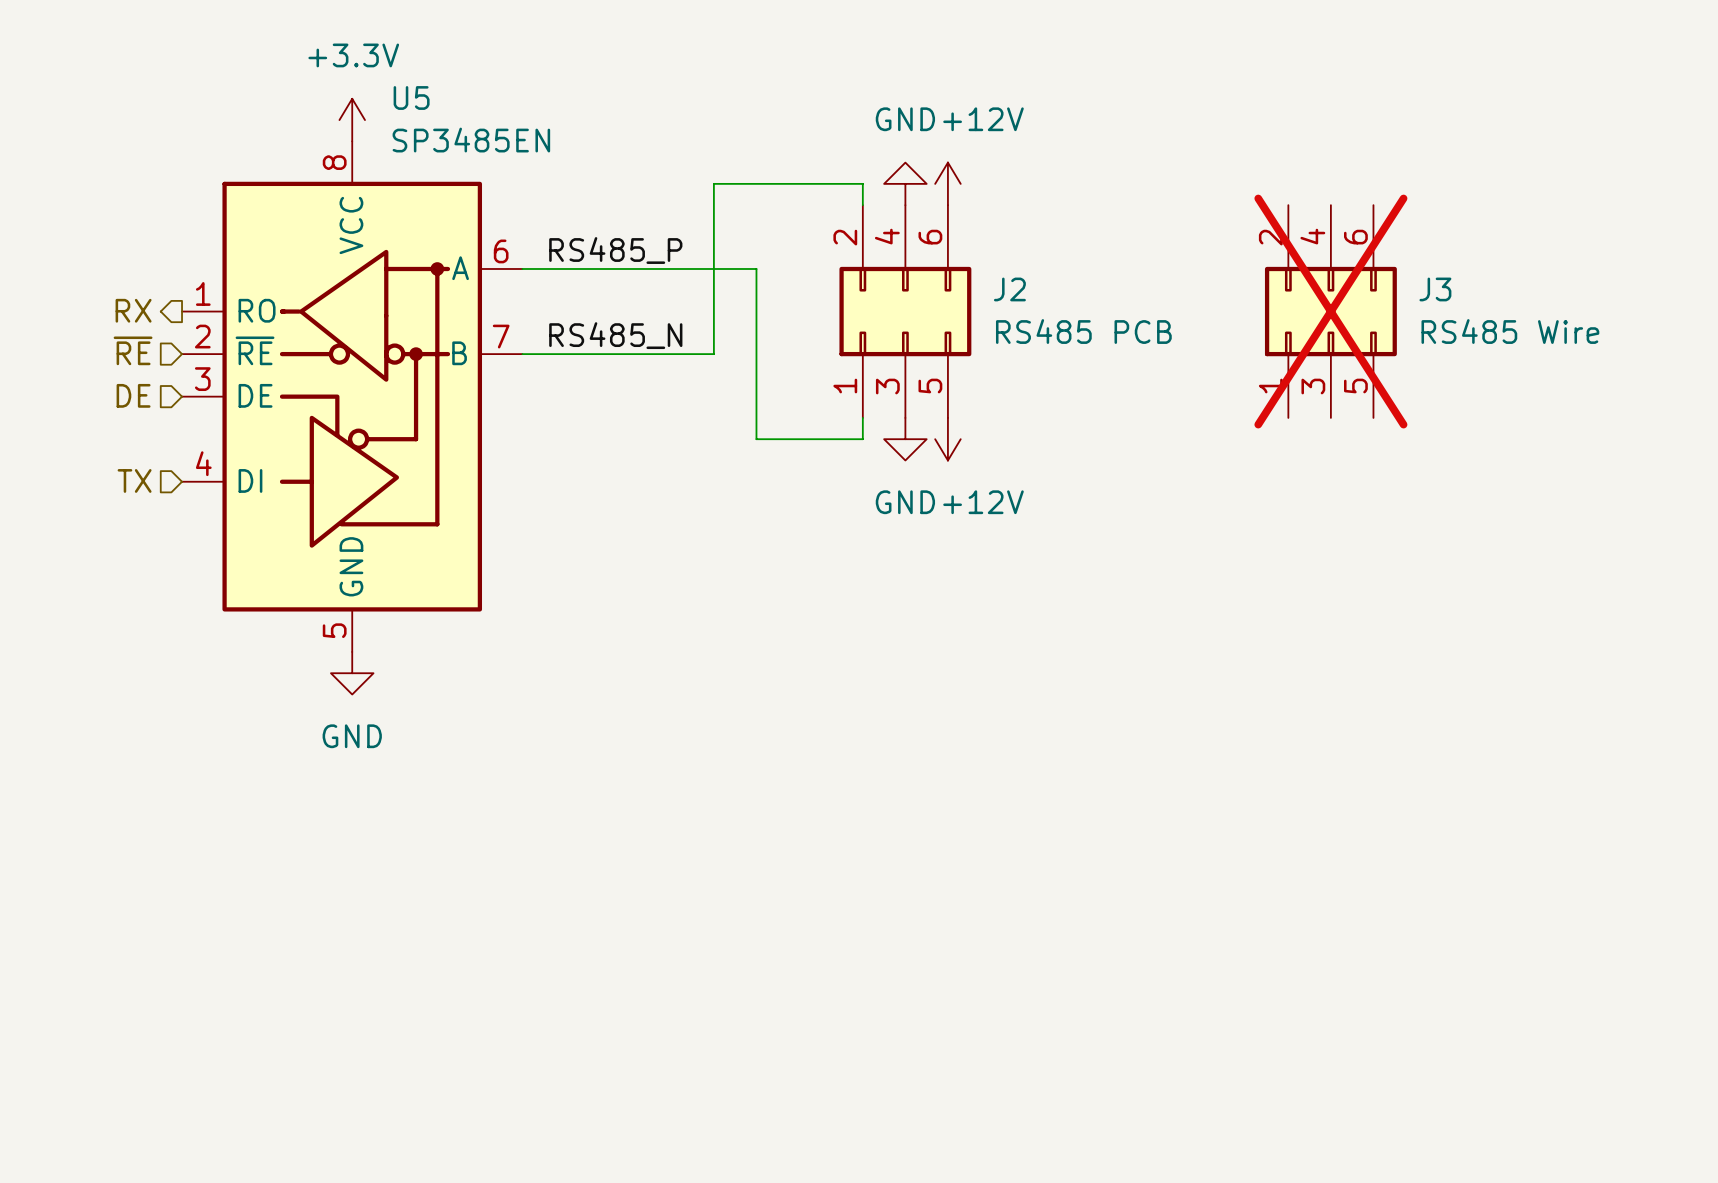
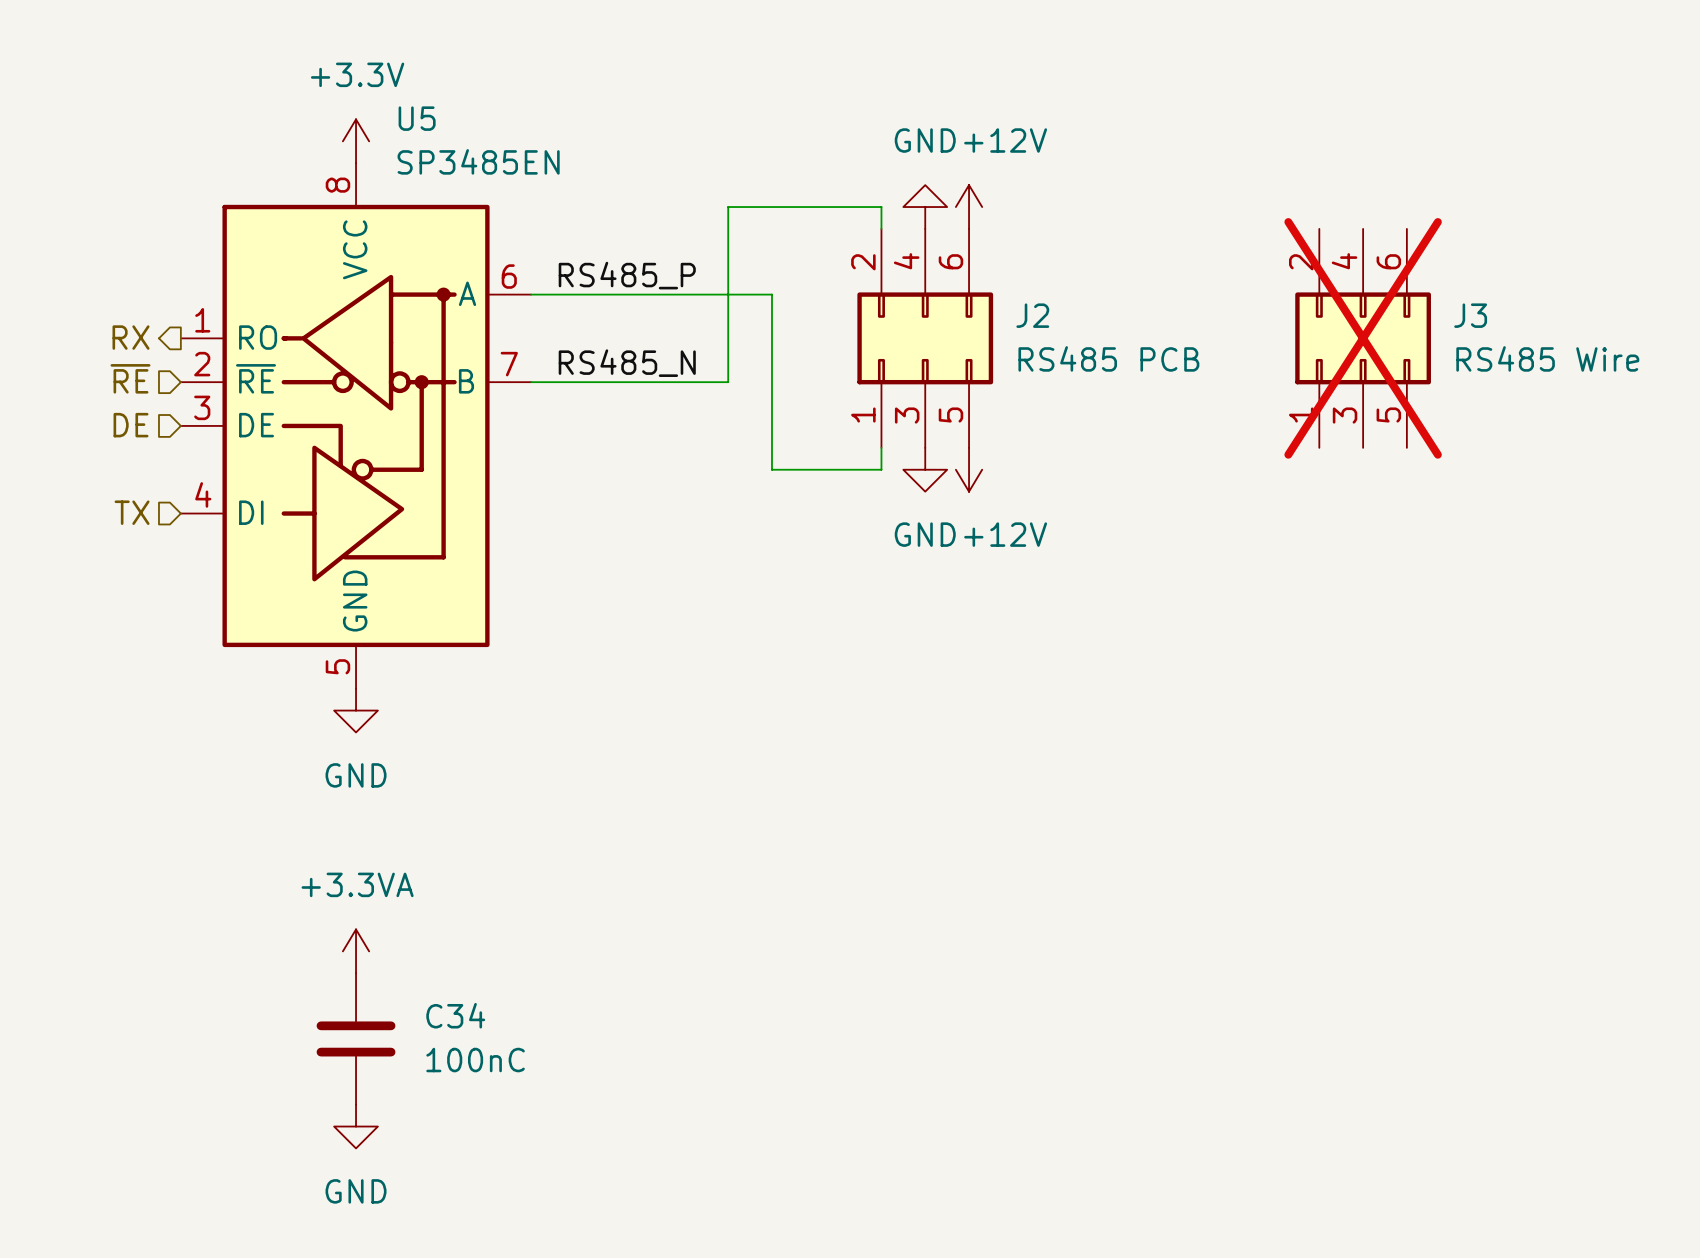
power symbol: none -> +3.3VA (356, 951)
C34: none -> 100nC (356, 1038)
power symbol: none -> GND (356, 1126)

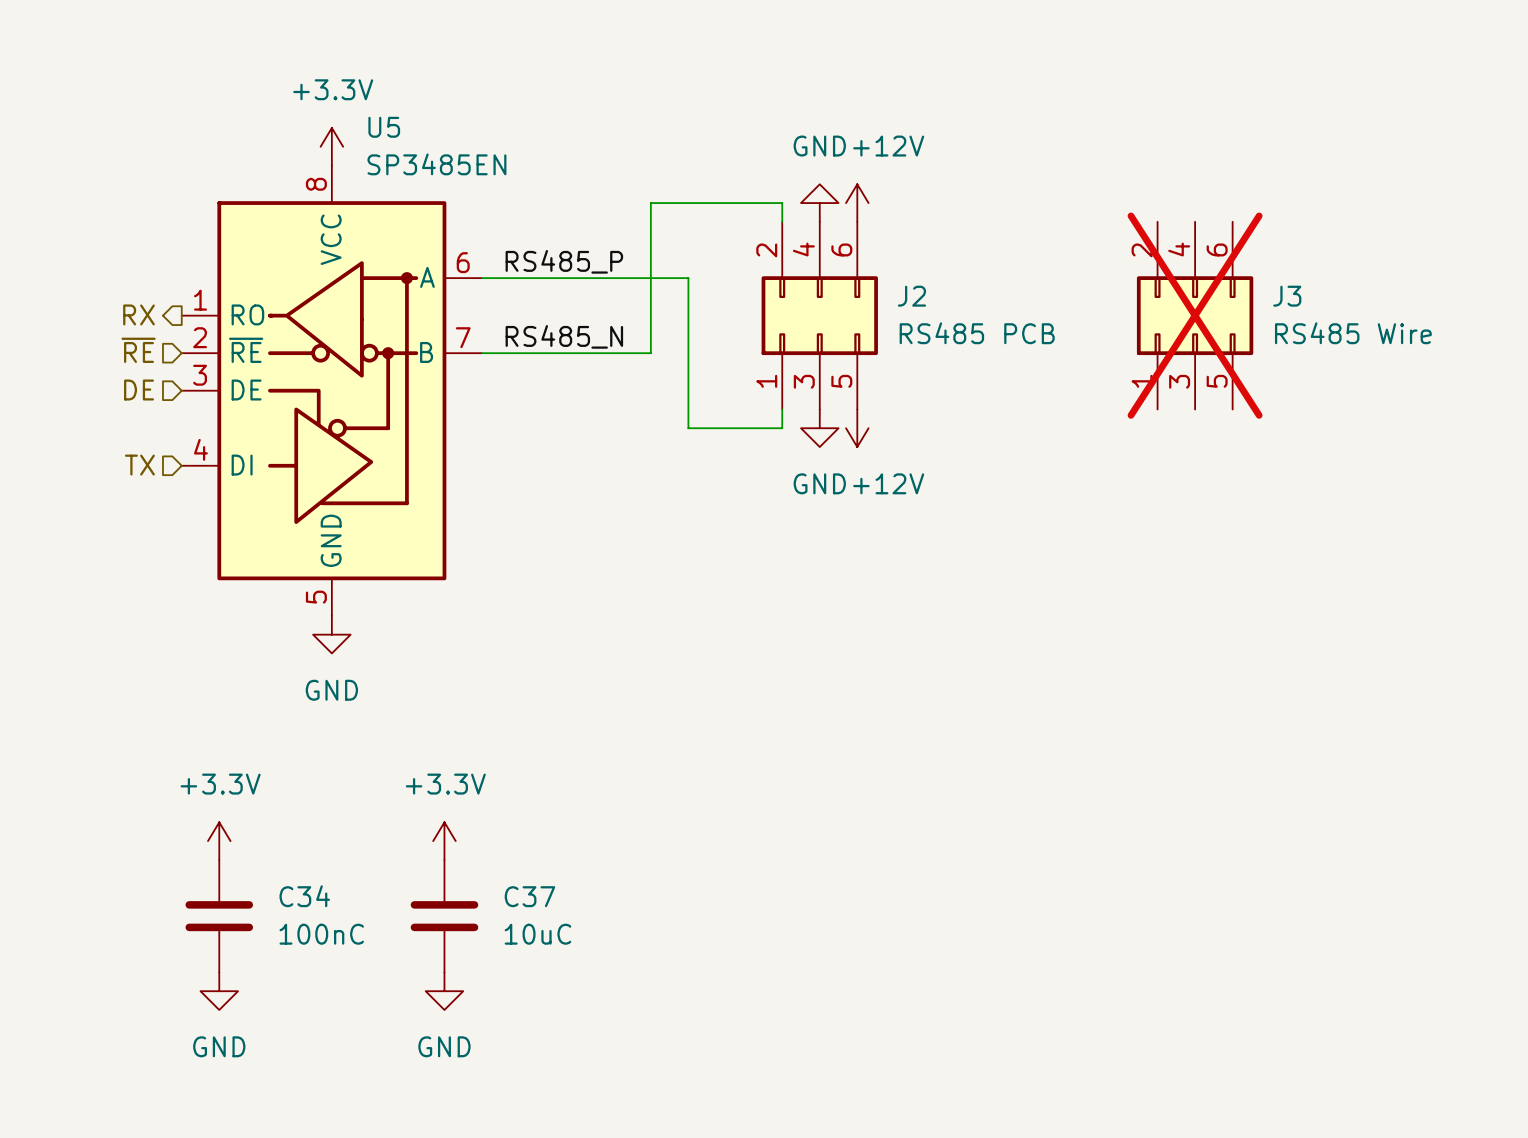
power symbol: none -> +3.3V (219, 841)
power symbol: +3.3VA (356, 951) -> none
power symbol: none -> +3.3V (444, 841)
C34 position: (356, 1038) -> (219, 916)
C37: none -> 10uC (444, 916)
power symbol: none -> GND (219, 991)
power symbol: GND (356, 1126) -> none
power symbol: none -> GND (444, 991)

